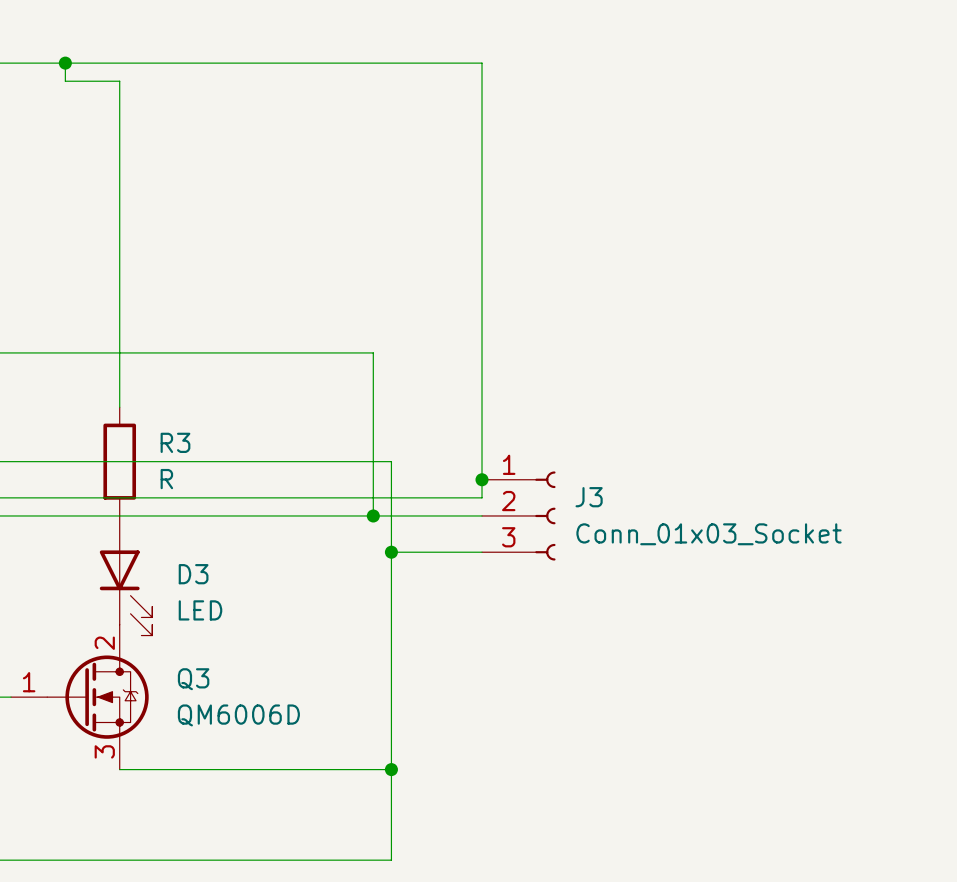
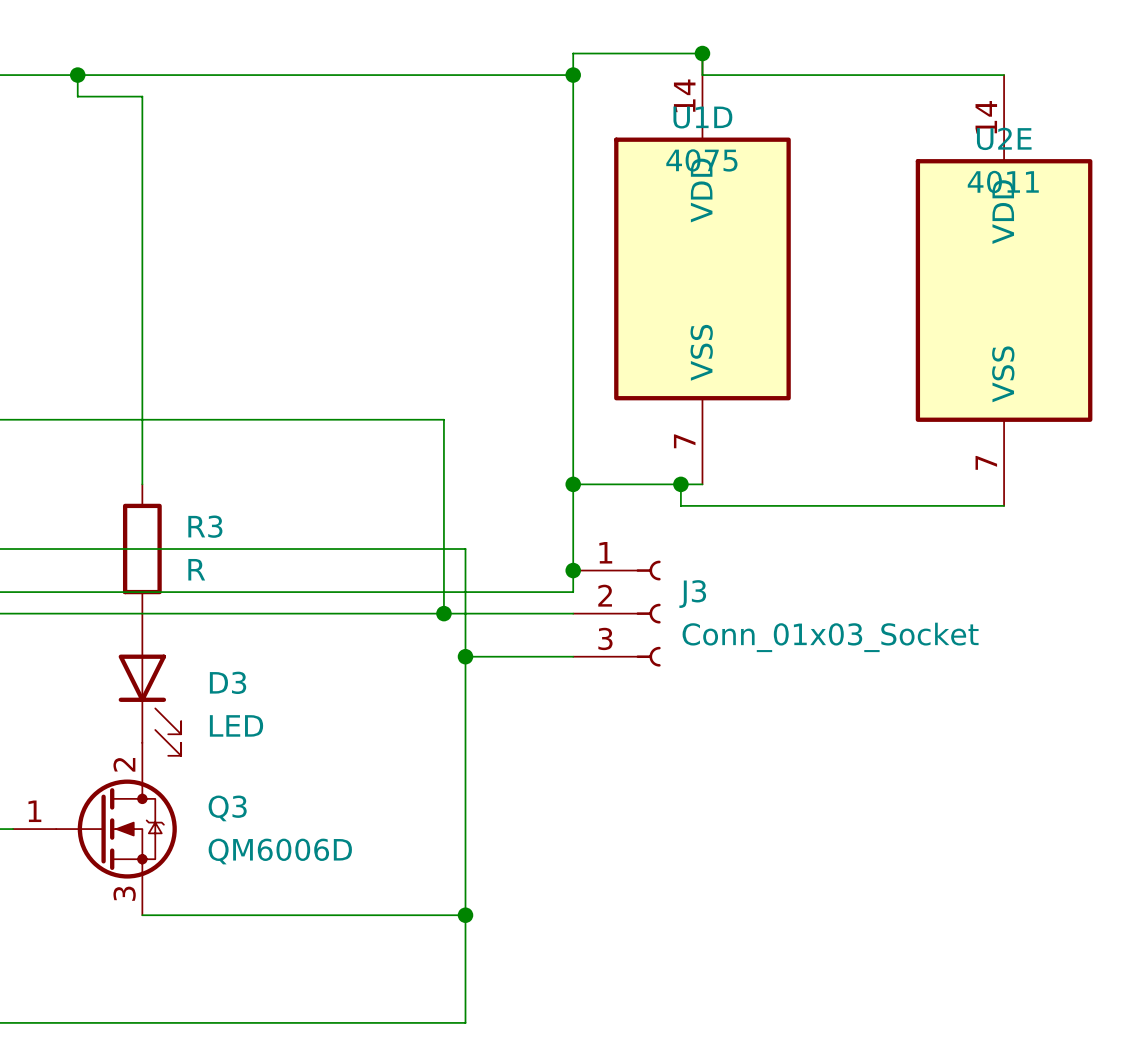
junction: none -> (702, 53)
wire: none -> (573, 75) (573, 53) (702, 53) (702, 75) (1004, 75)
junction: none -> (573, 75)
U1D: none -> 4075 (702, 268)
U2E: none -> 4011 (1004, 290)
wire: none -> (573, 484) (702, 484)
junction: none -> (573, 484)
wire: none -> (680, 484) (680, 505) (1004, 505)
junction: none -> (680, 484)

